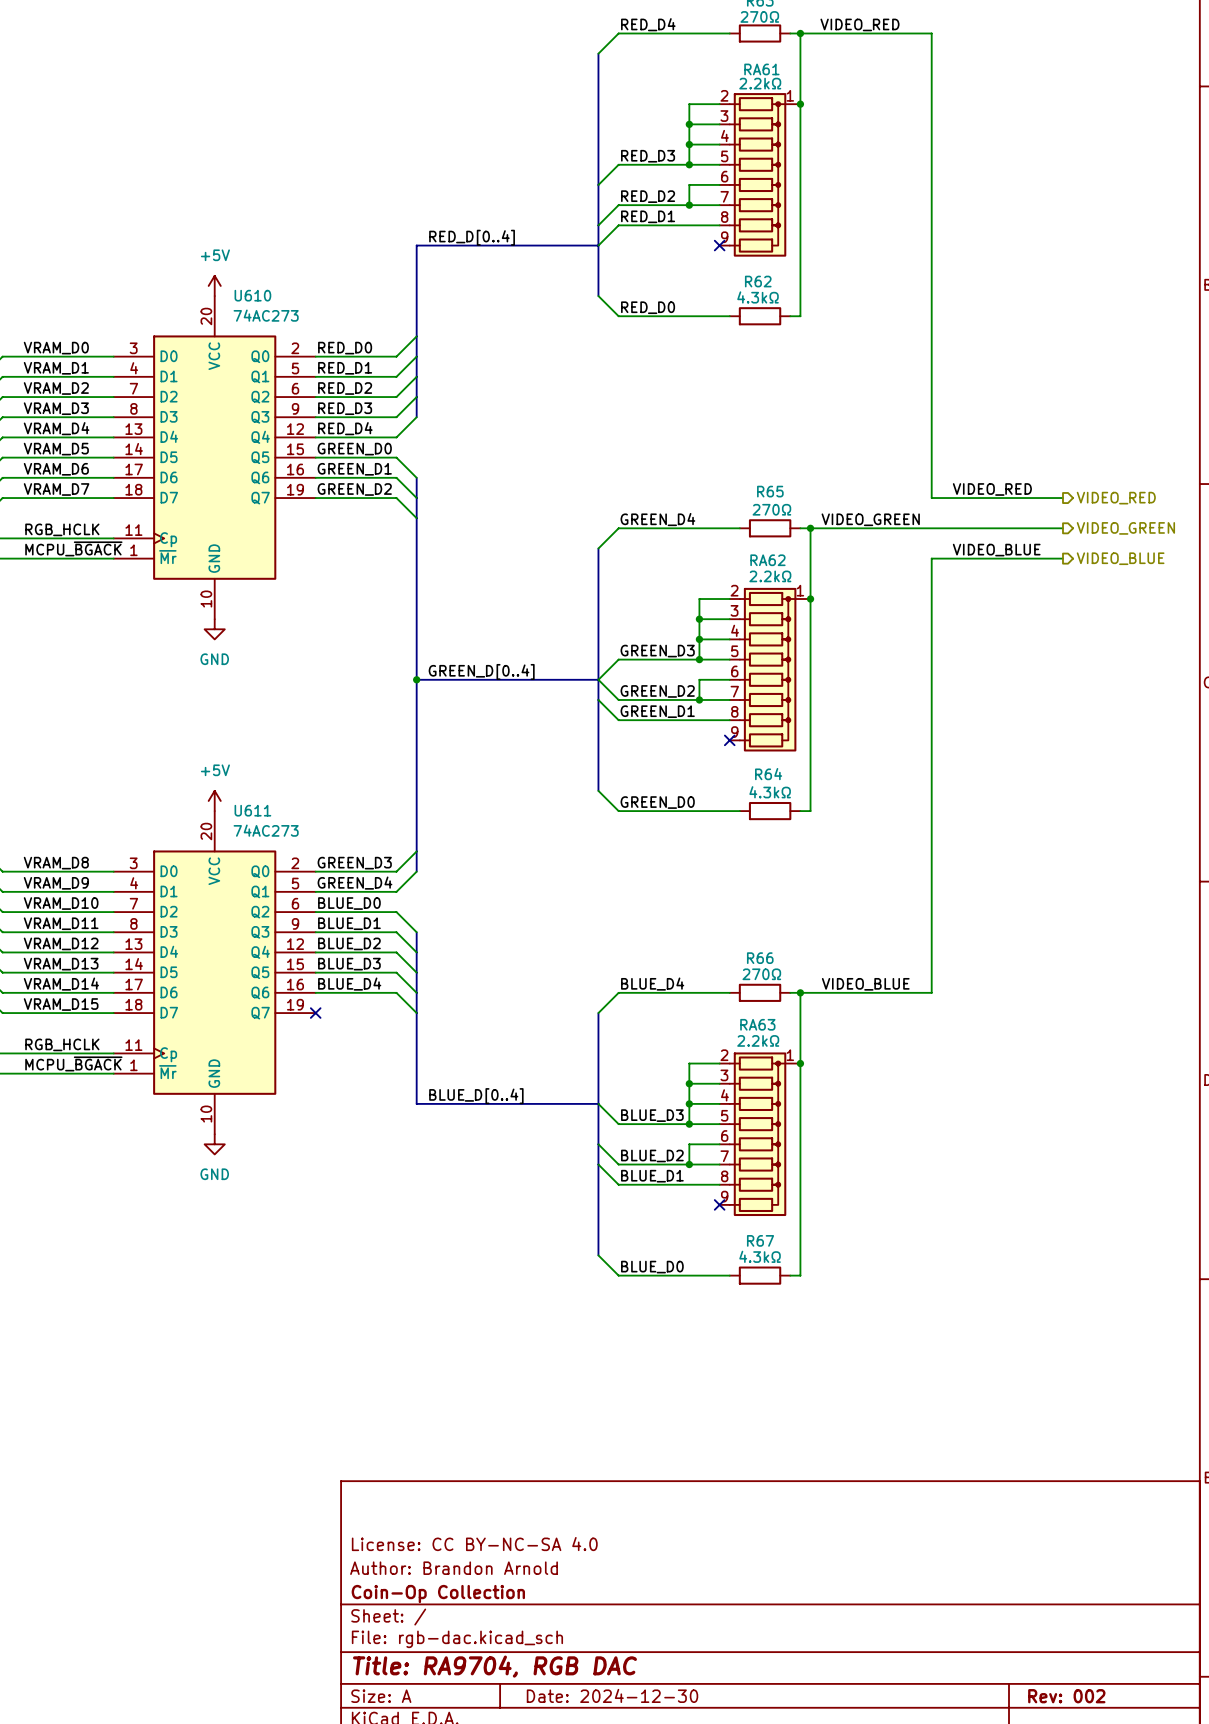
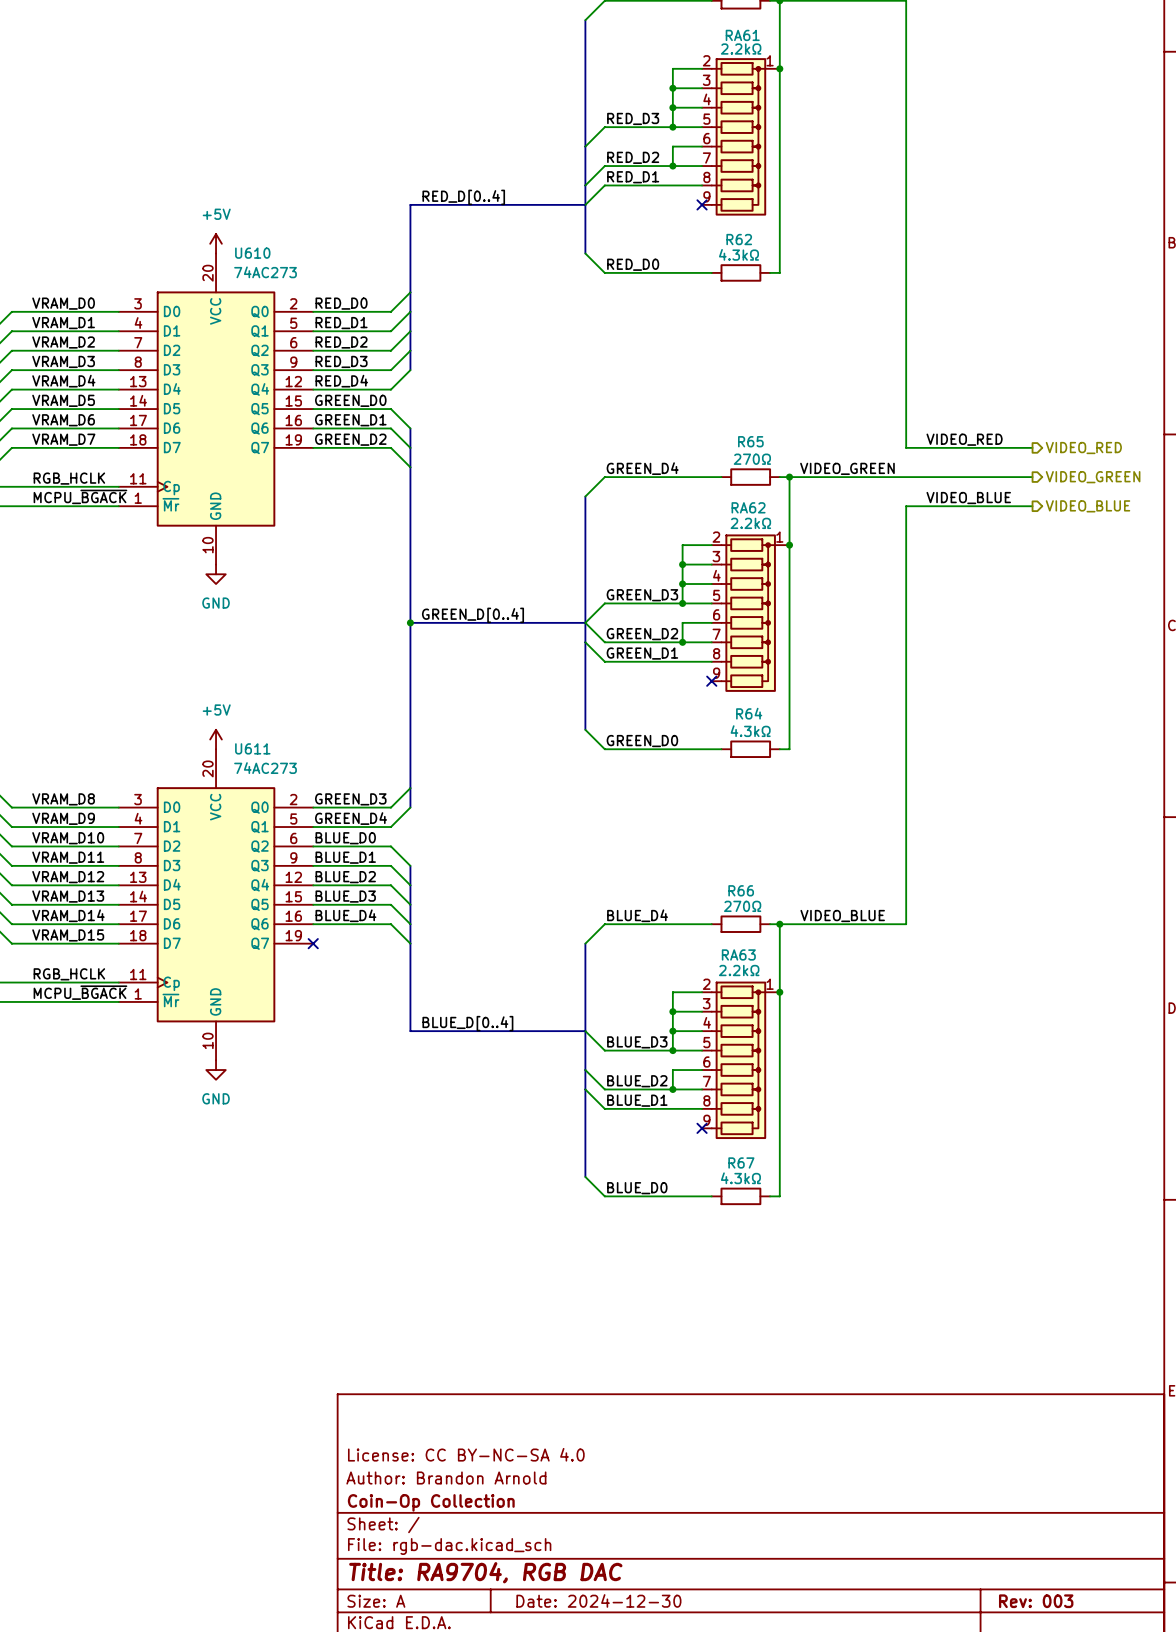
title block: Rev: 002 (1066, 1696) -> Rev: 003 (1036, 1601)

